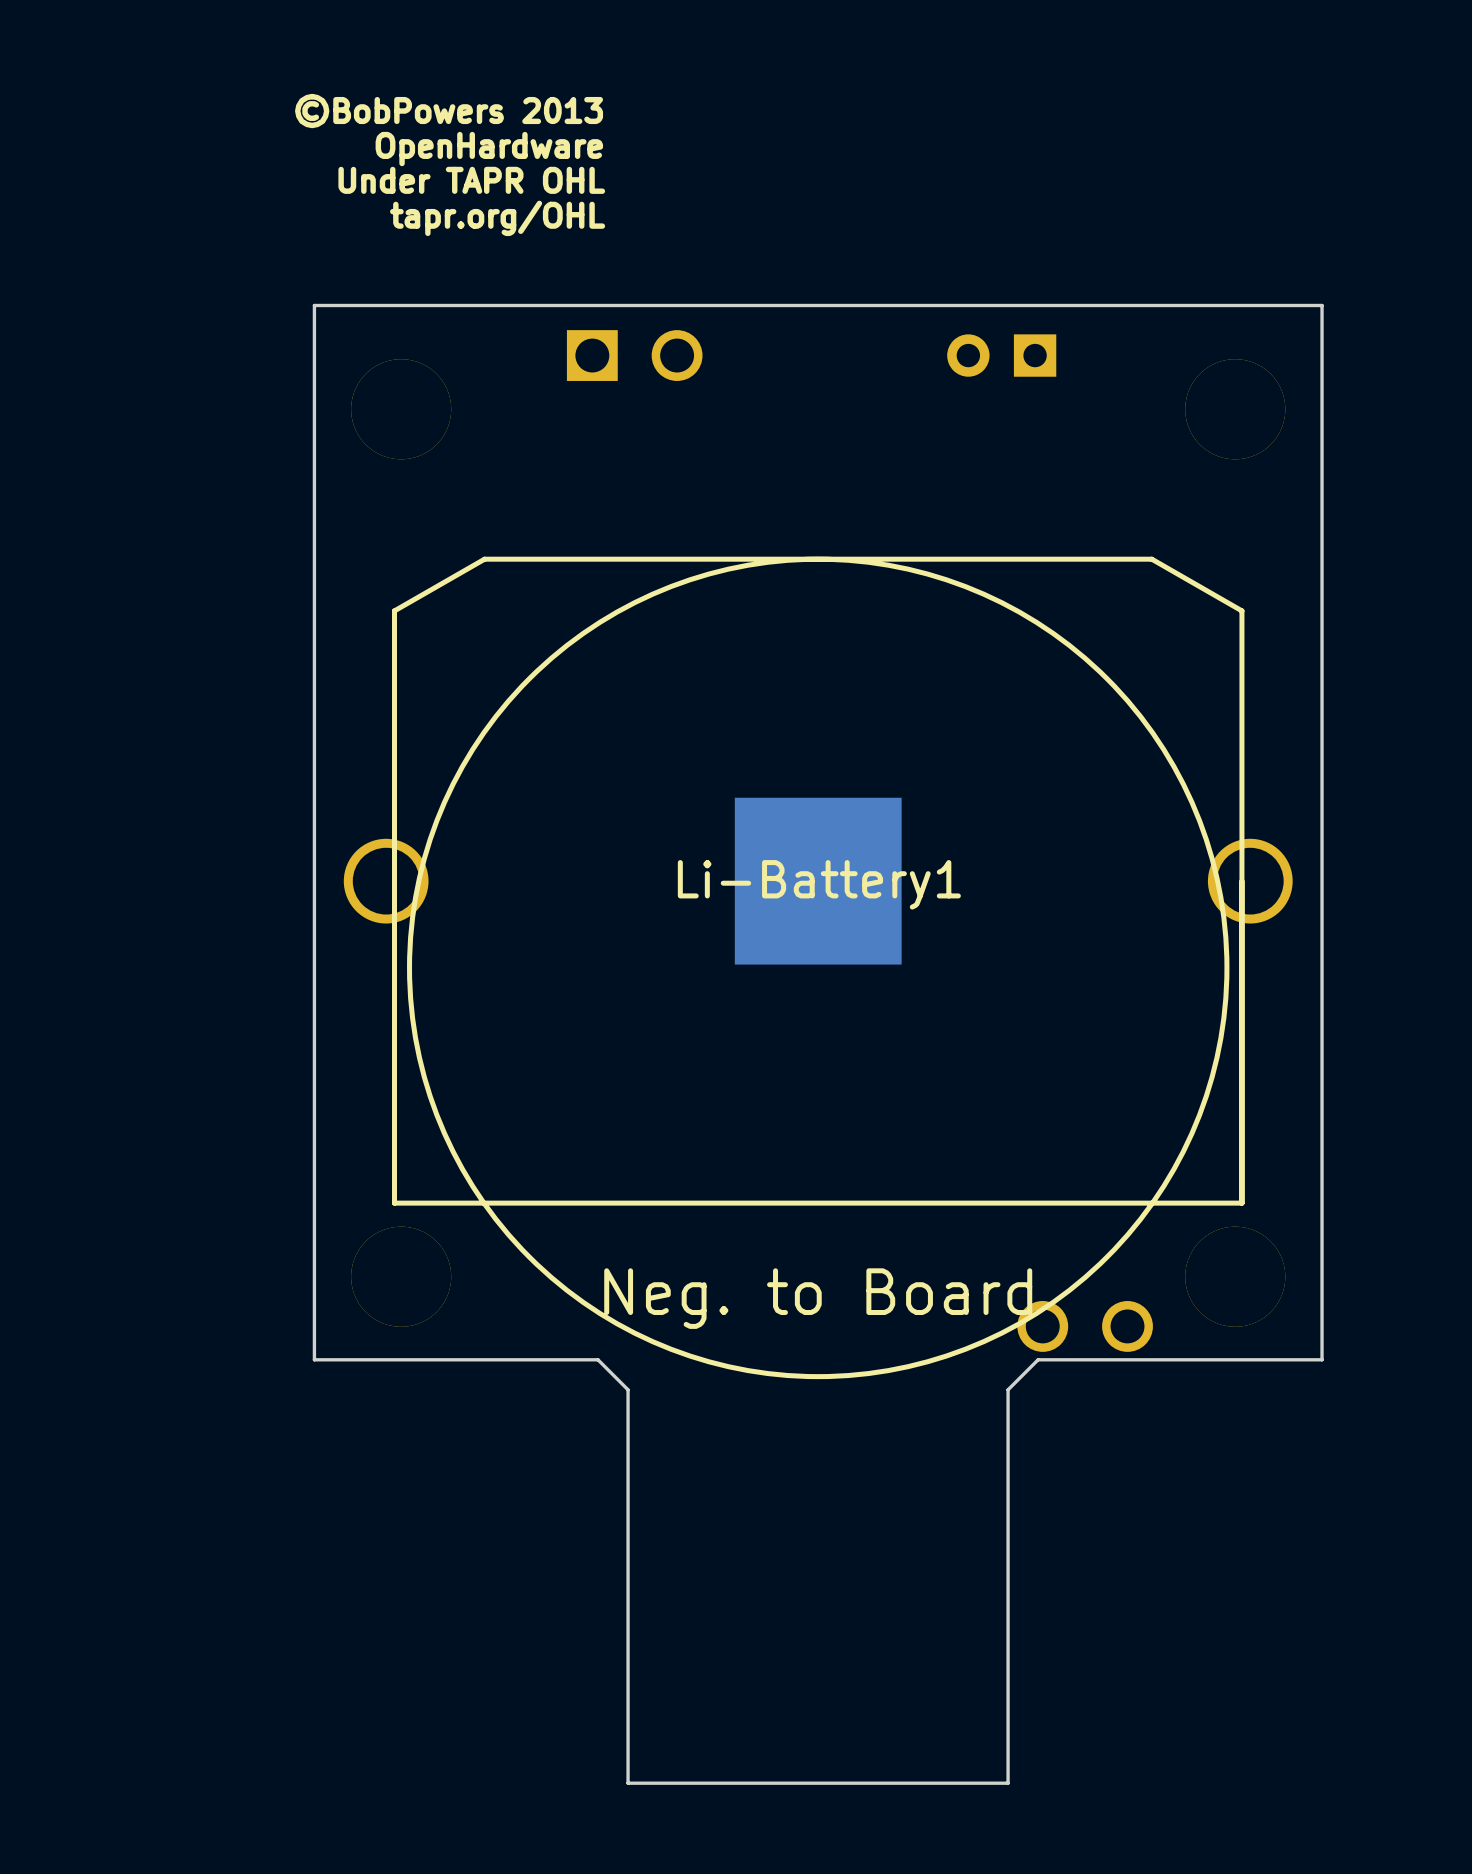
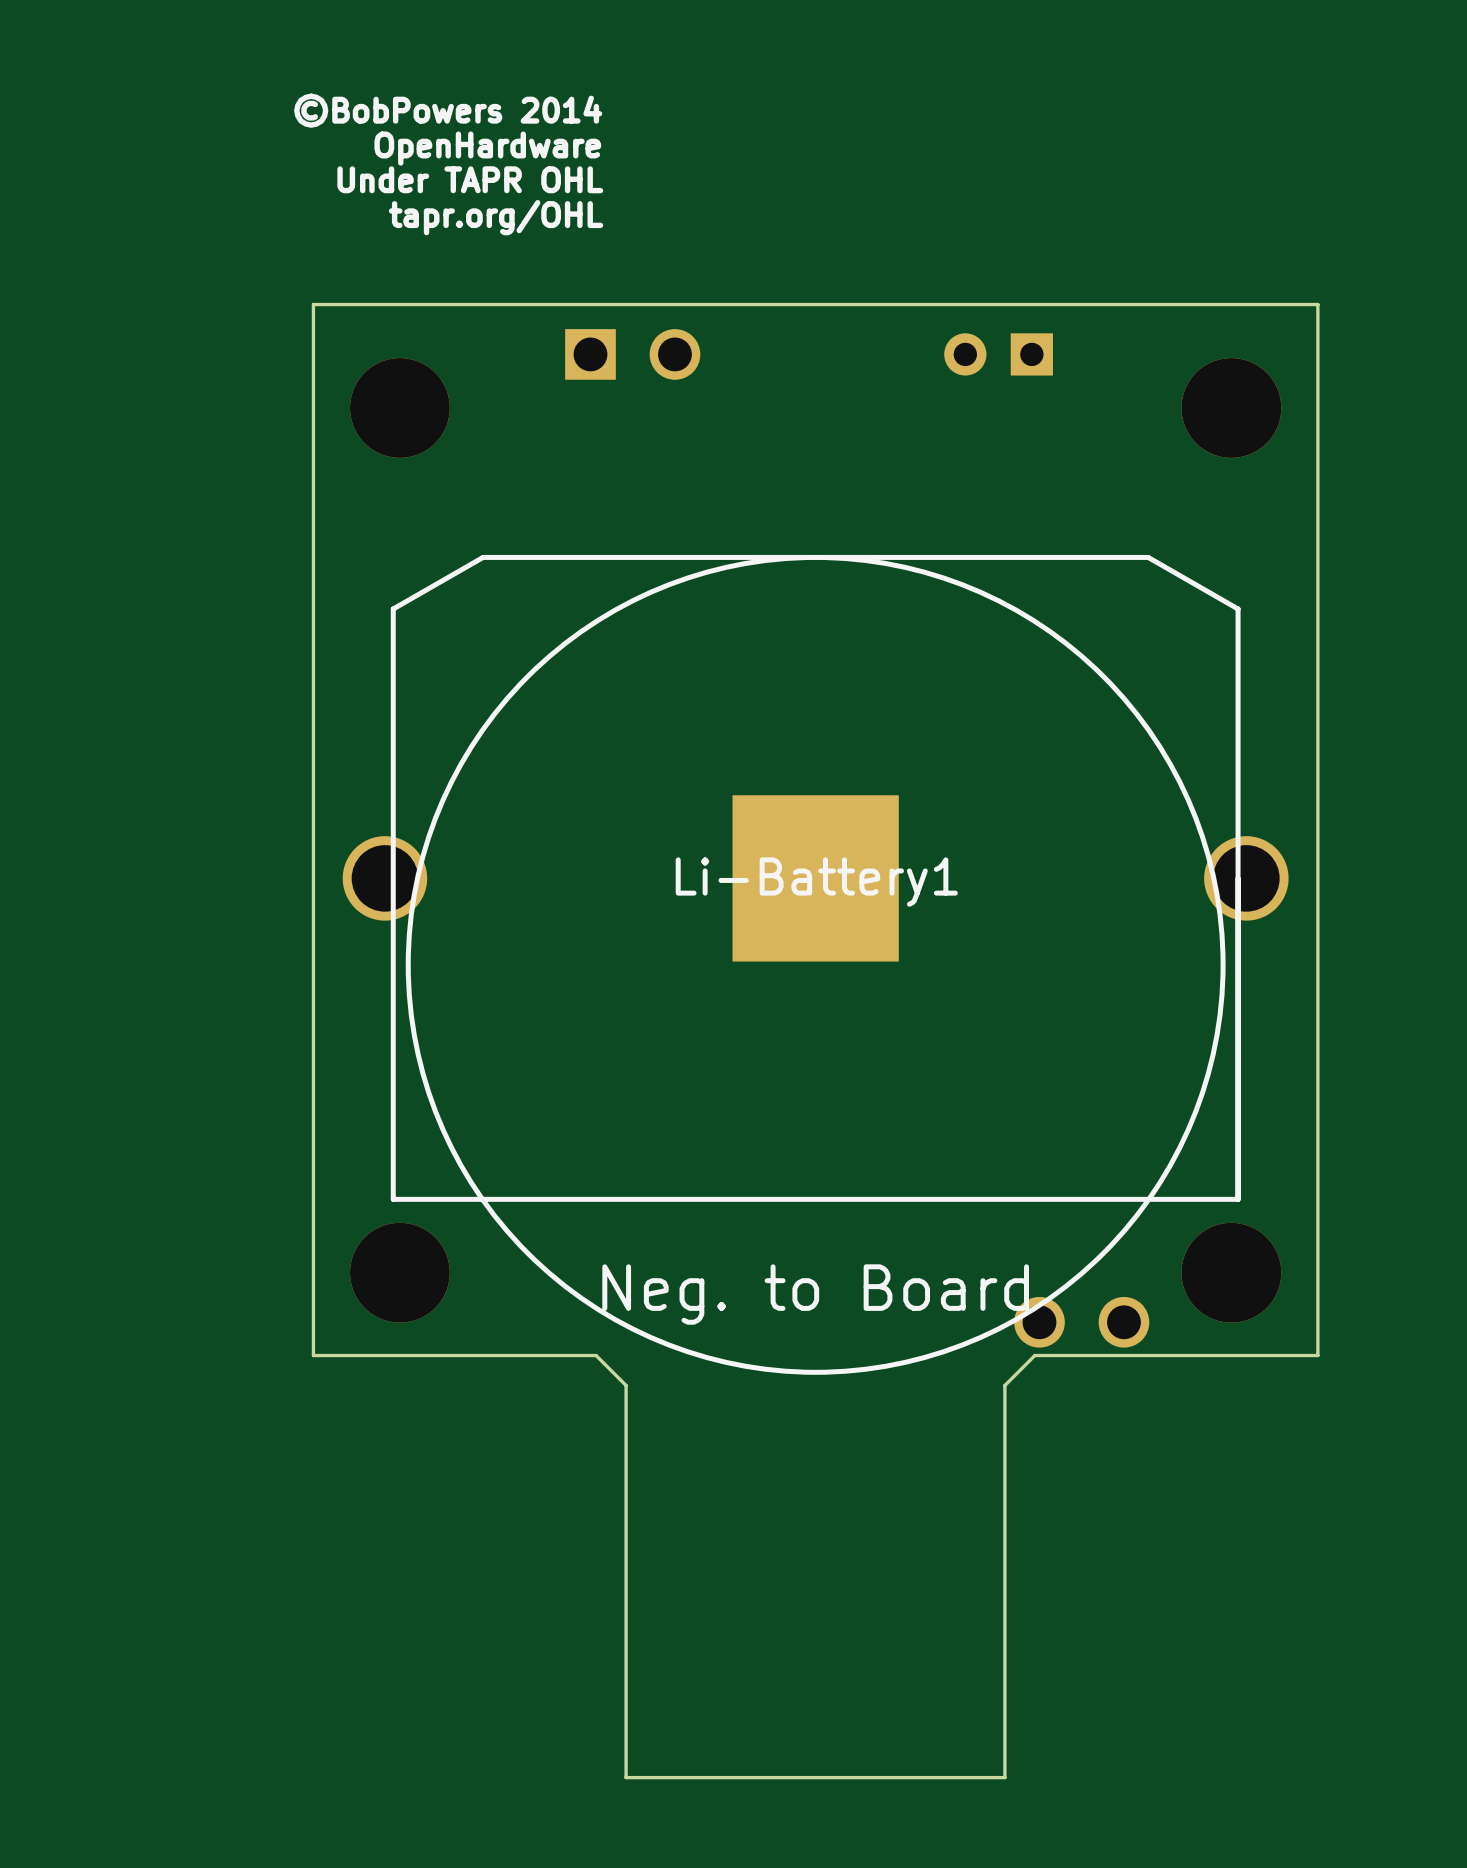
text: ©BobPowers 2013 (449, 111) -> ©BobPowers 2014 (448, 110)

